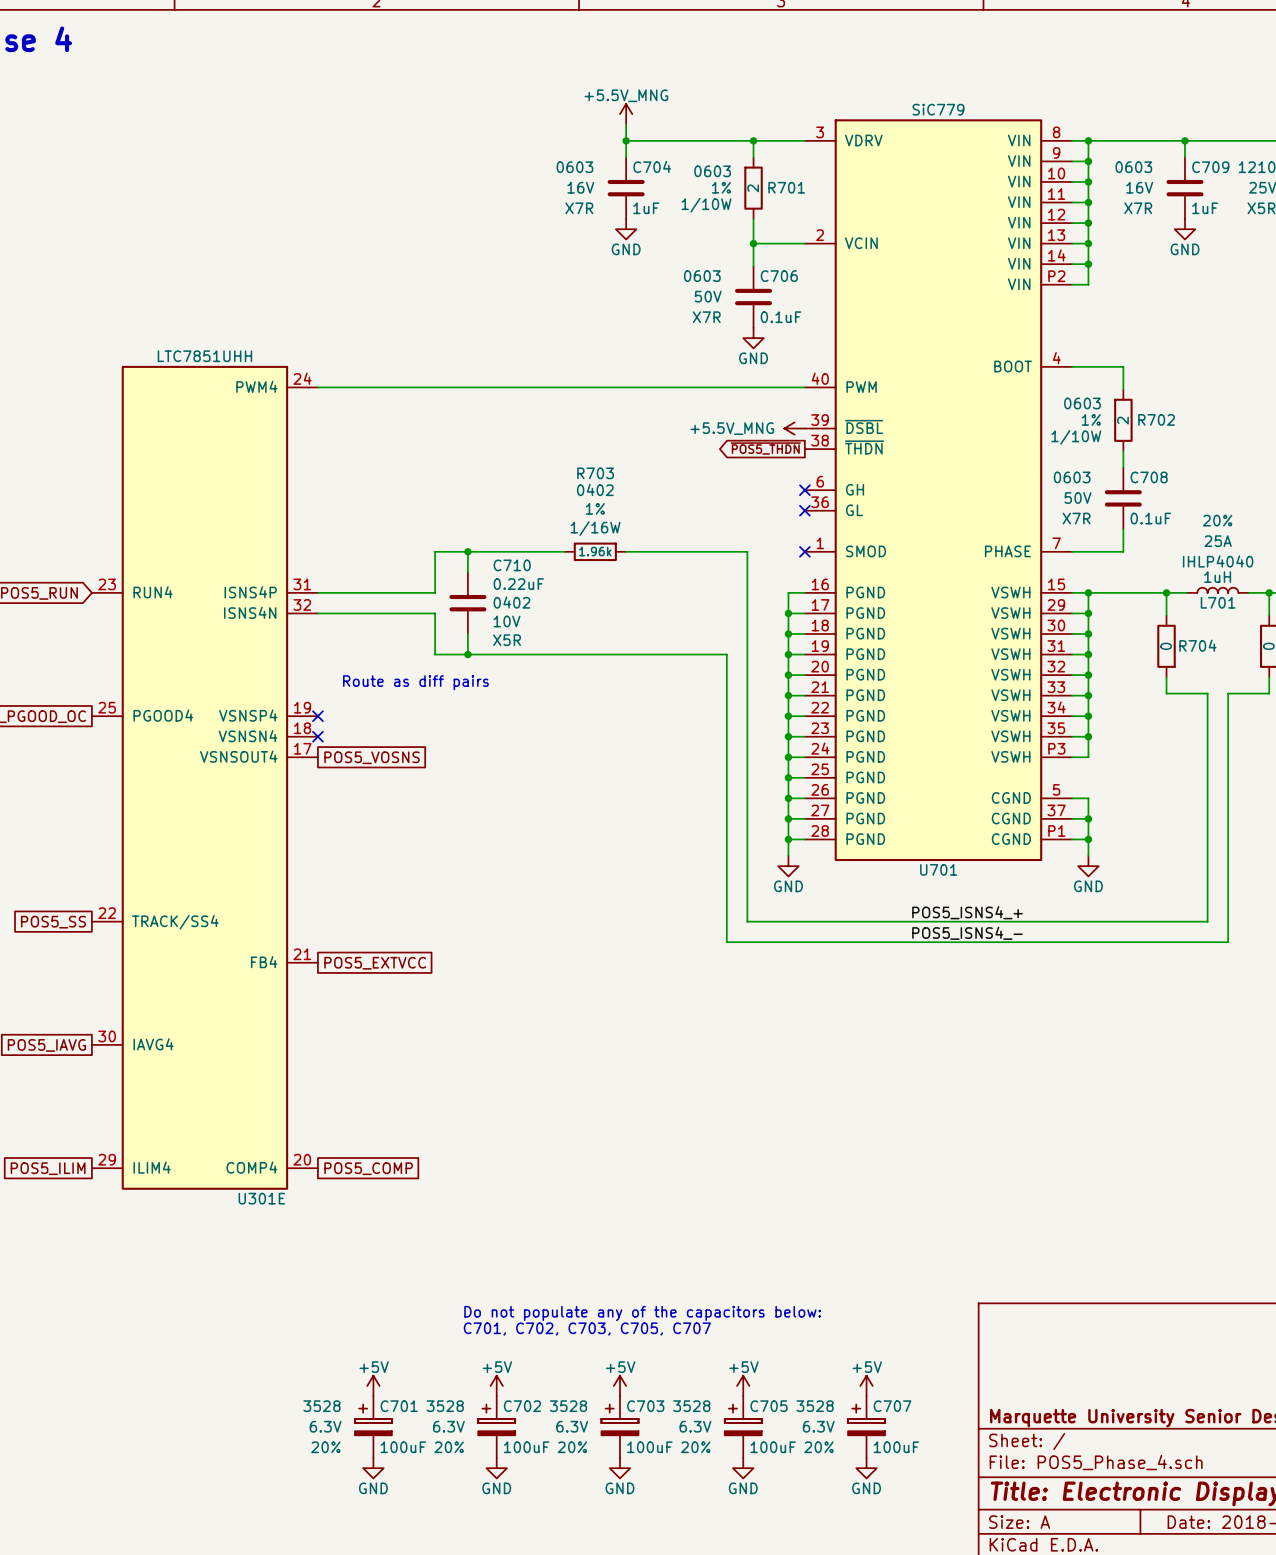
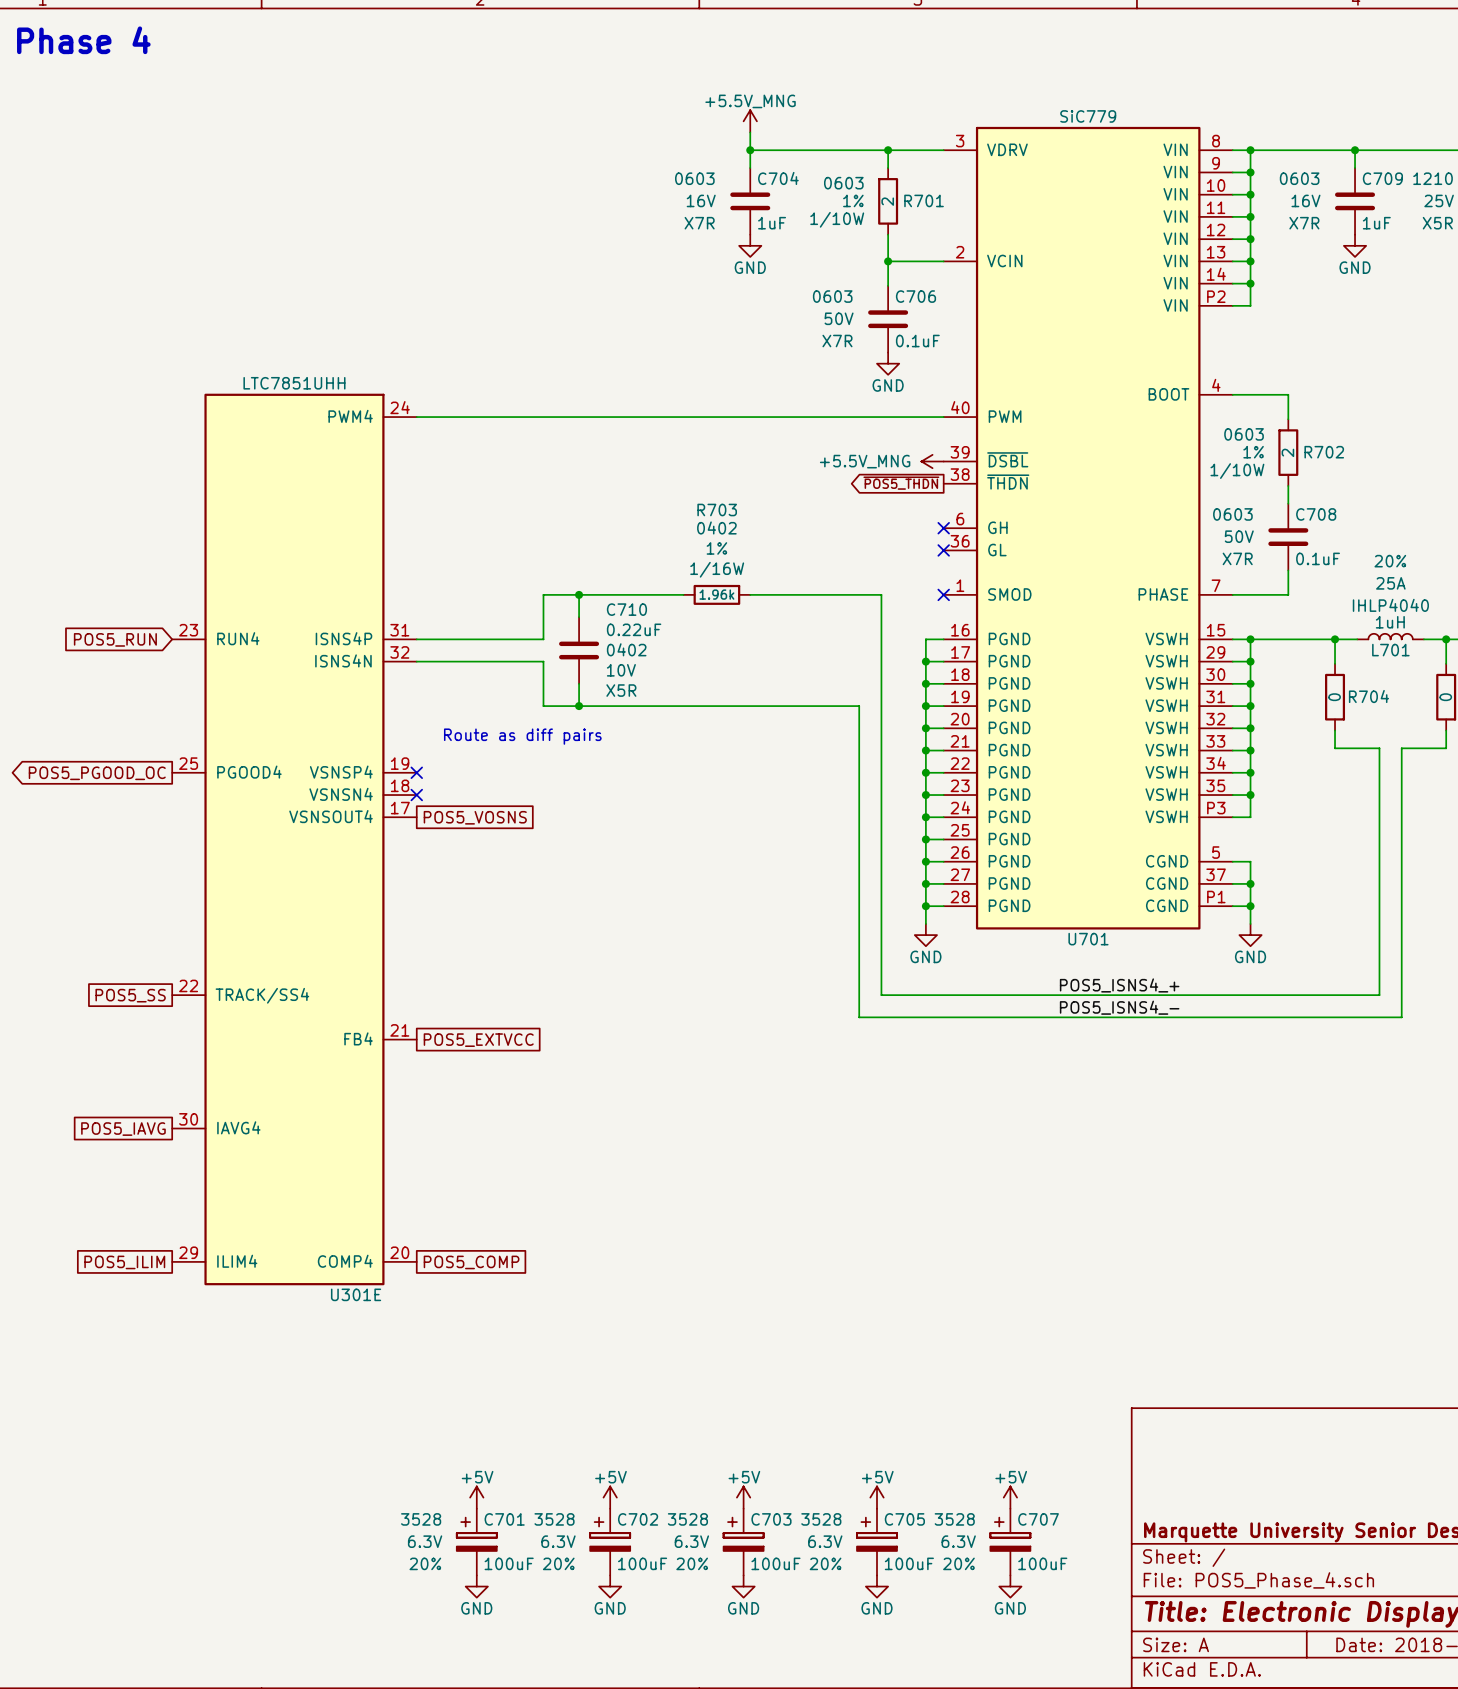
text: Do not populate any of the capacitors below: (642, 1313) -> none
text: C701, C702, C703, C705, C707 (587, 1329) -> none

